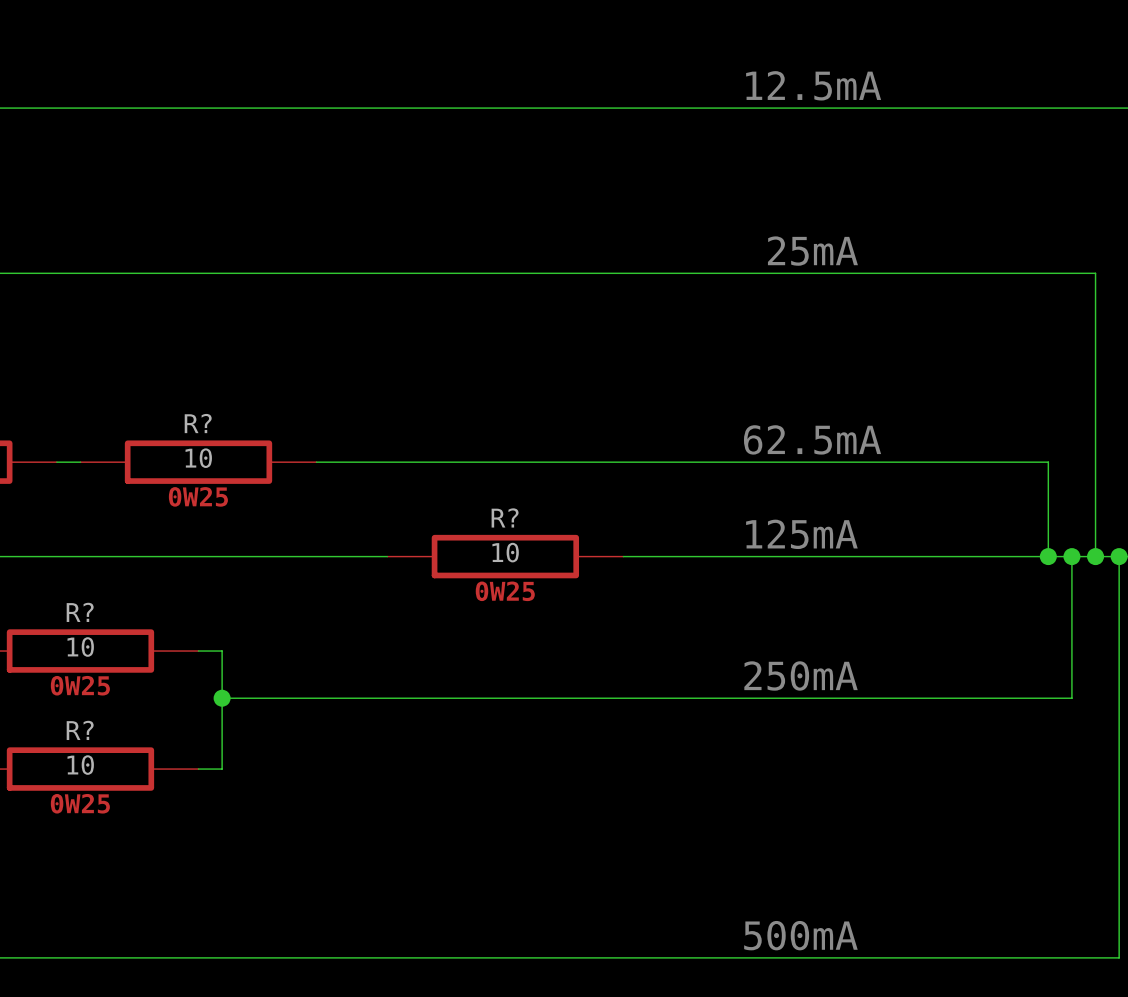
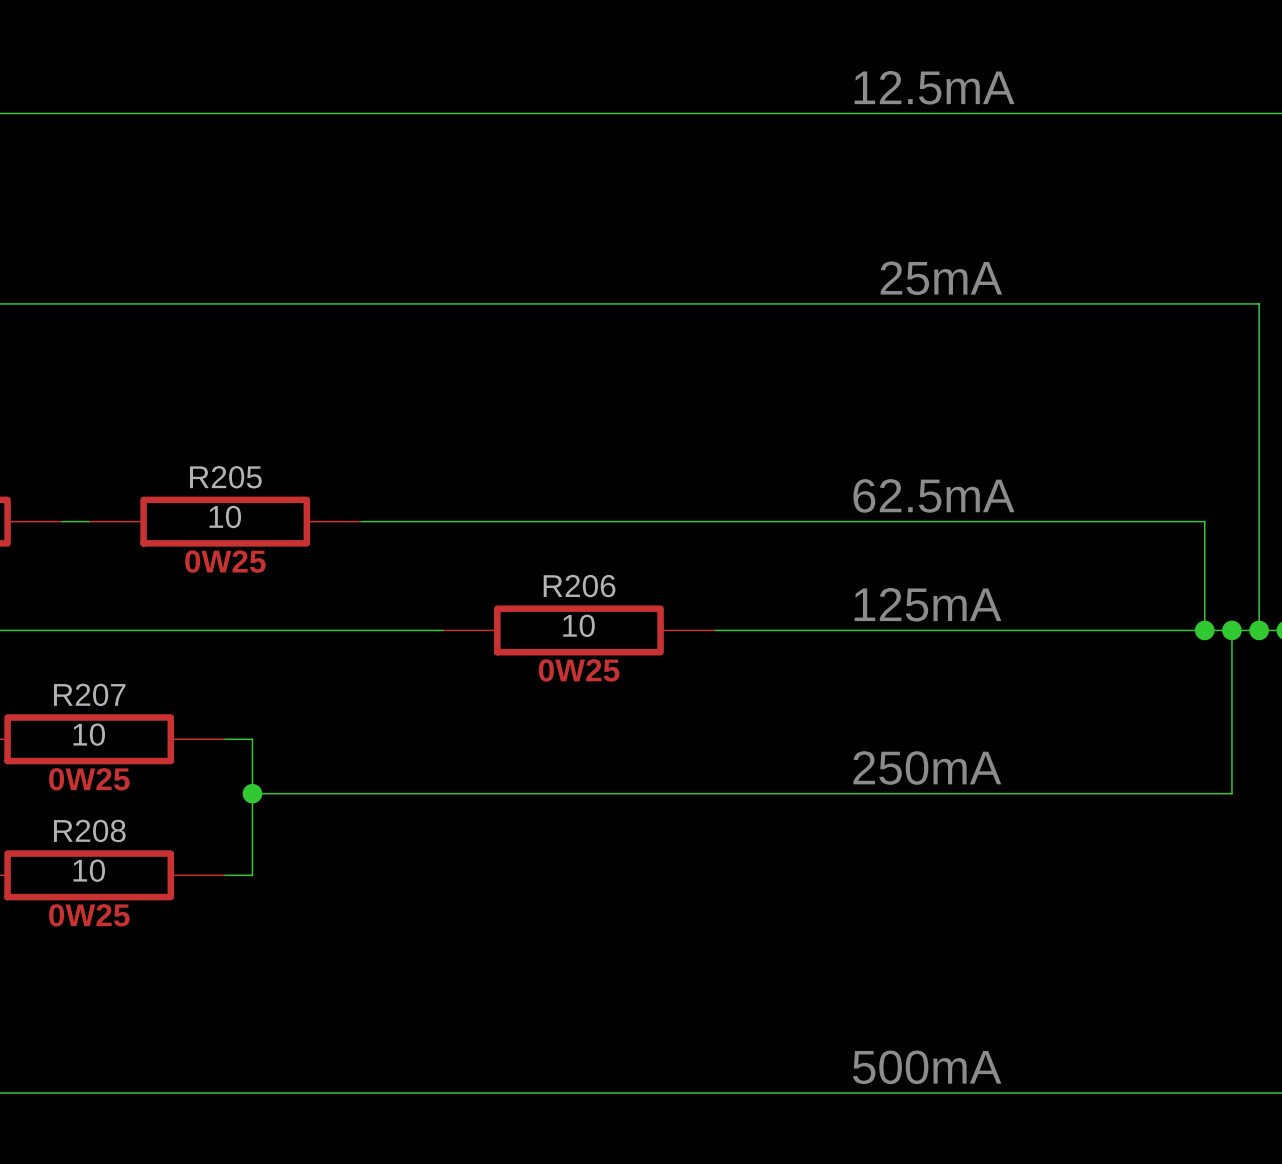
R? name: R? (198, 423) -> R205 (225, 477)
R? name: R? (505, 517) -> R206 (579, 586)
R? name: R? (80, 612) -> R207 (89, 694)
R? name: R? (80, 730) -> R208 (89, 830)

